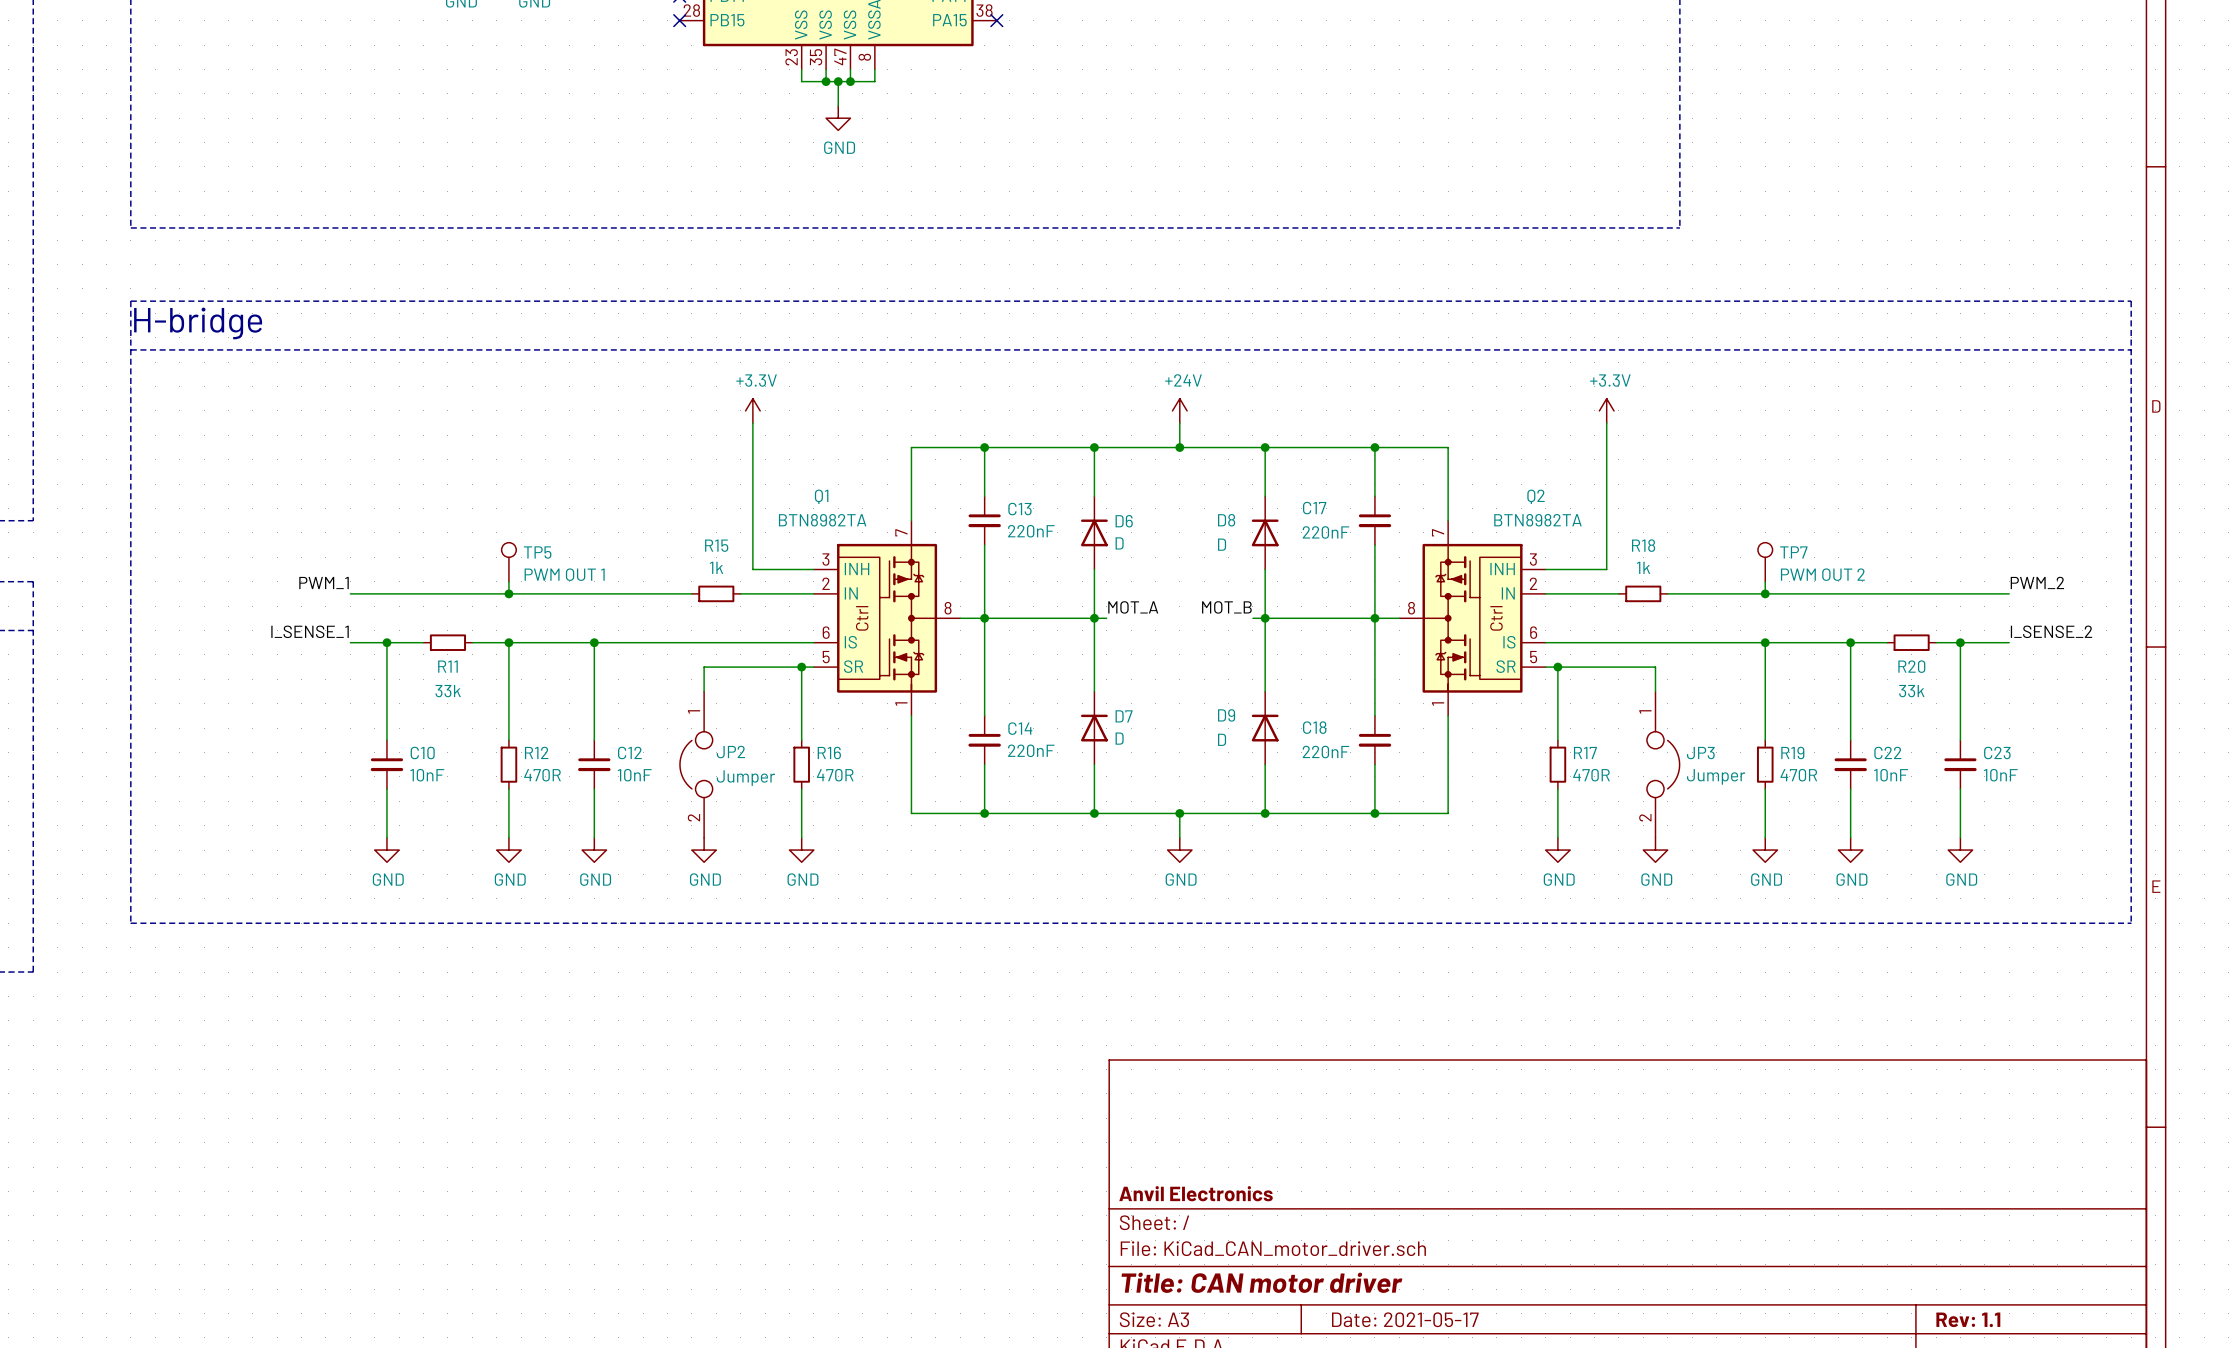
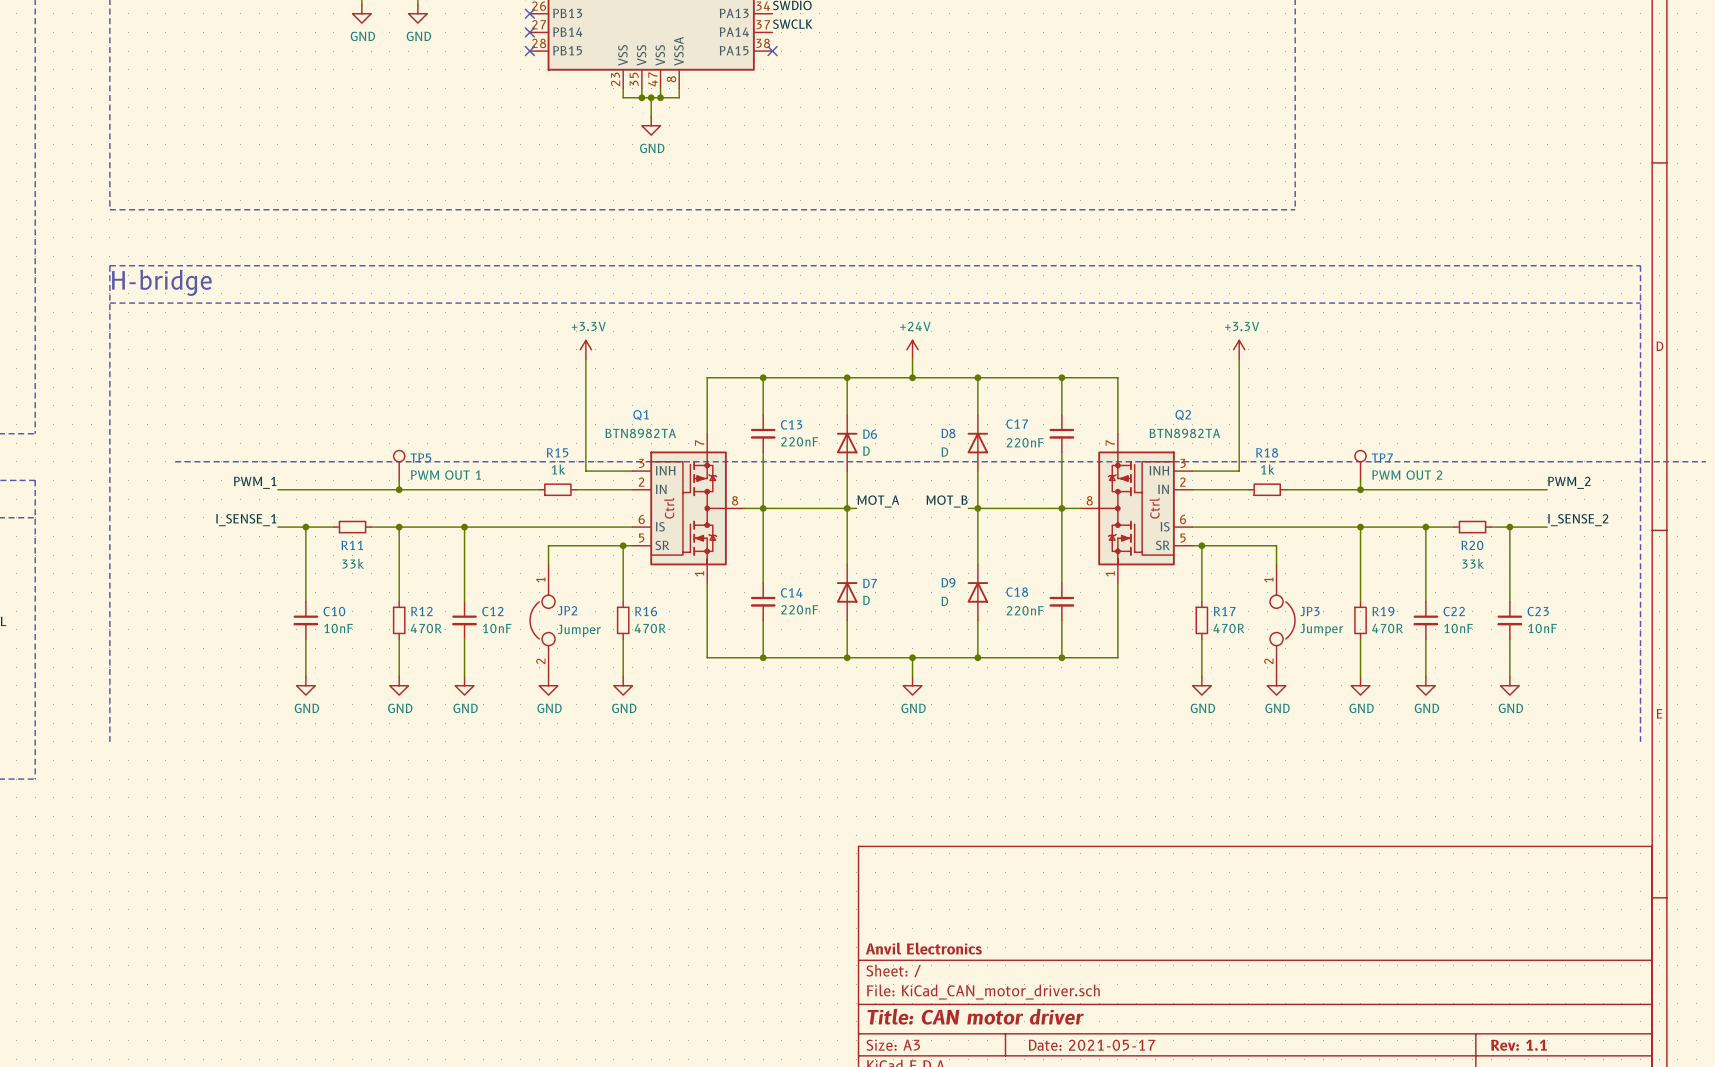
line: none -> (175, 461) (1705, 461)
line: (130, 923) (2131, 923) -> none

